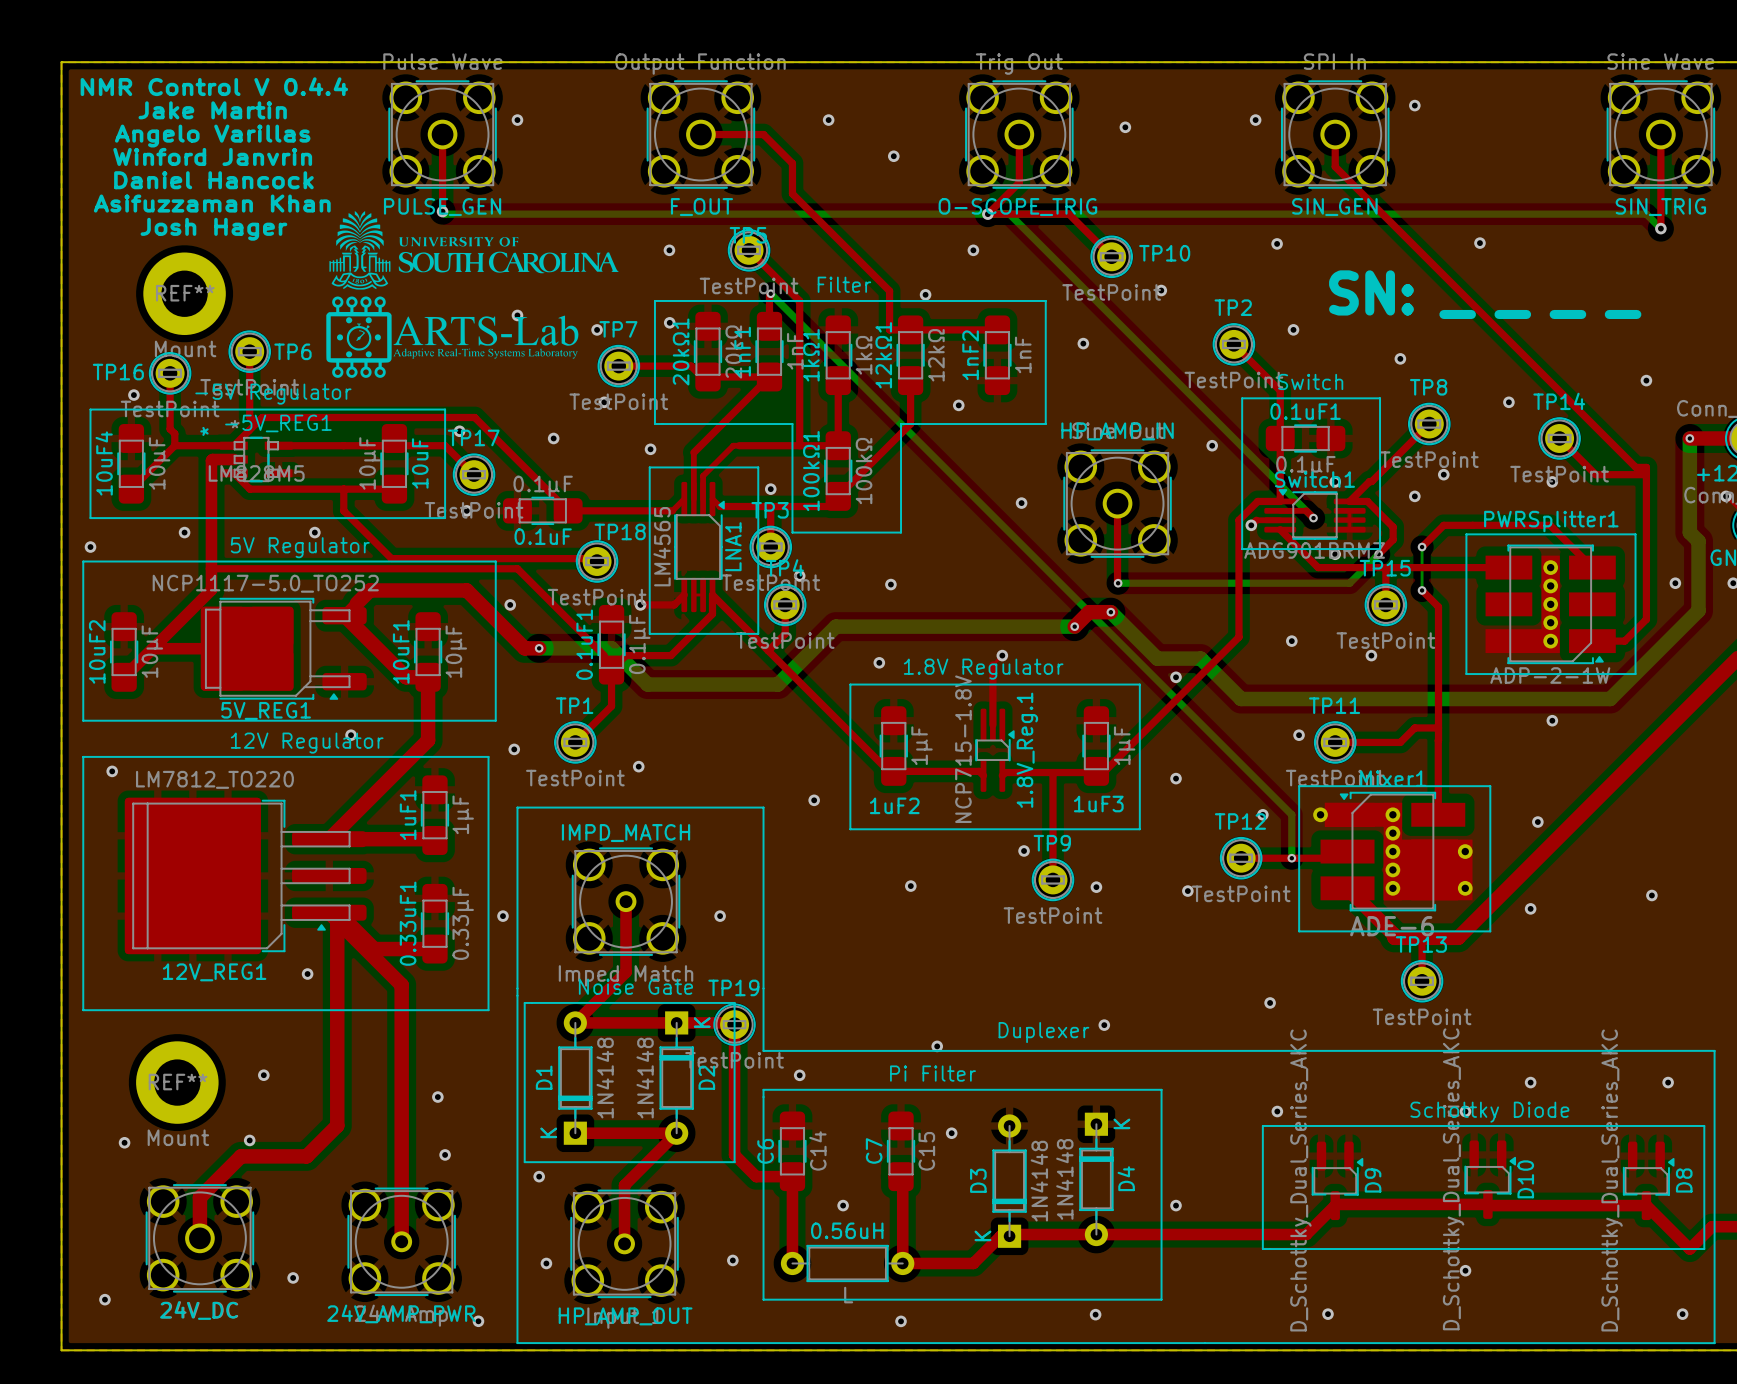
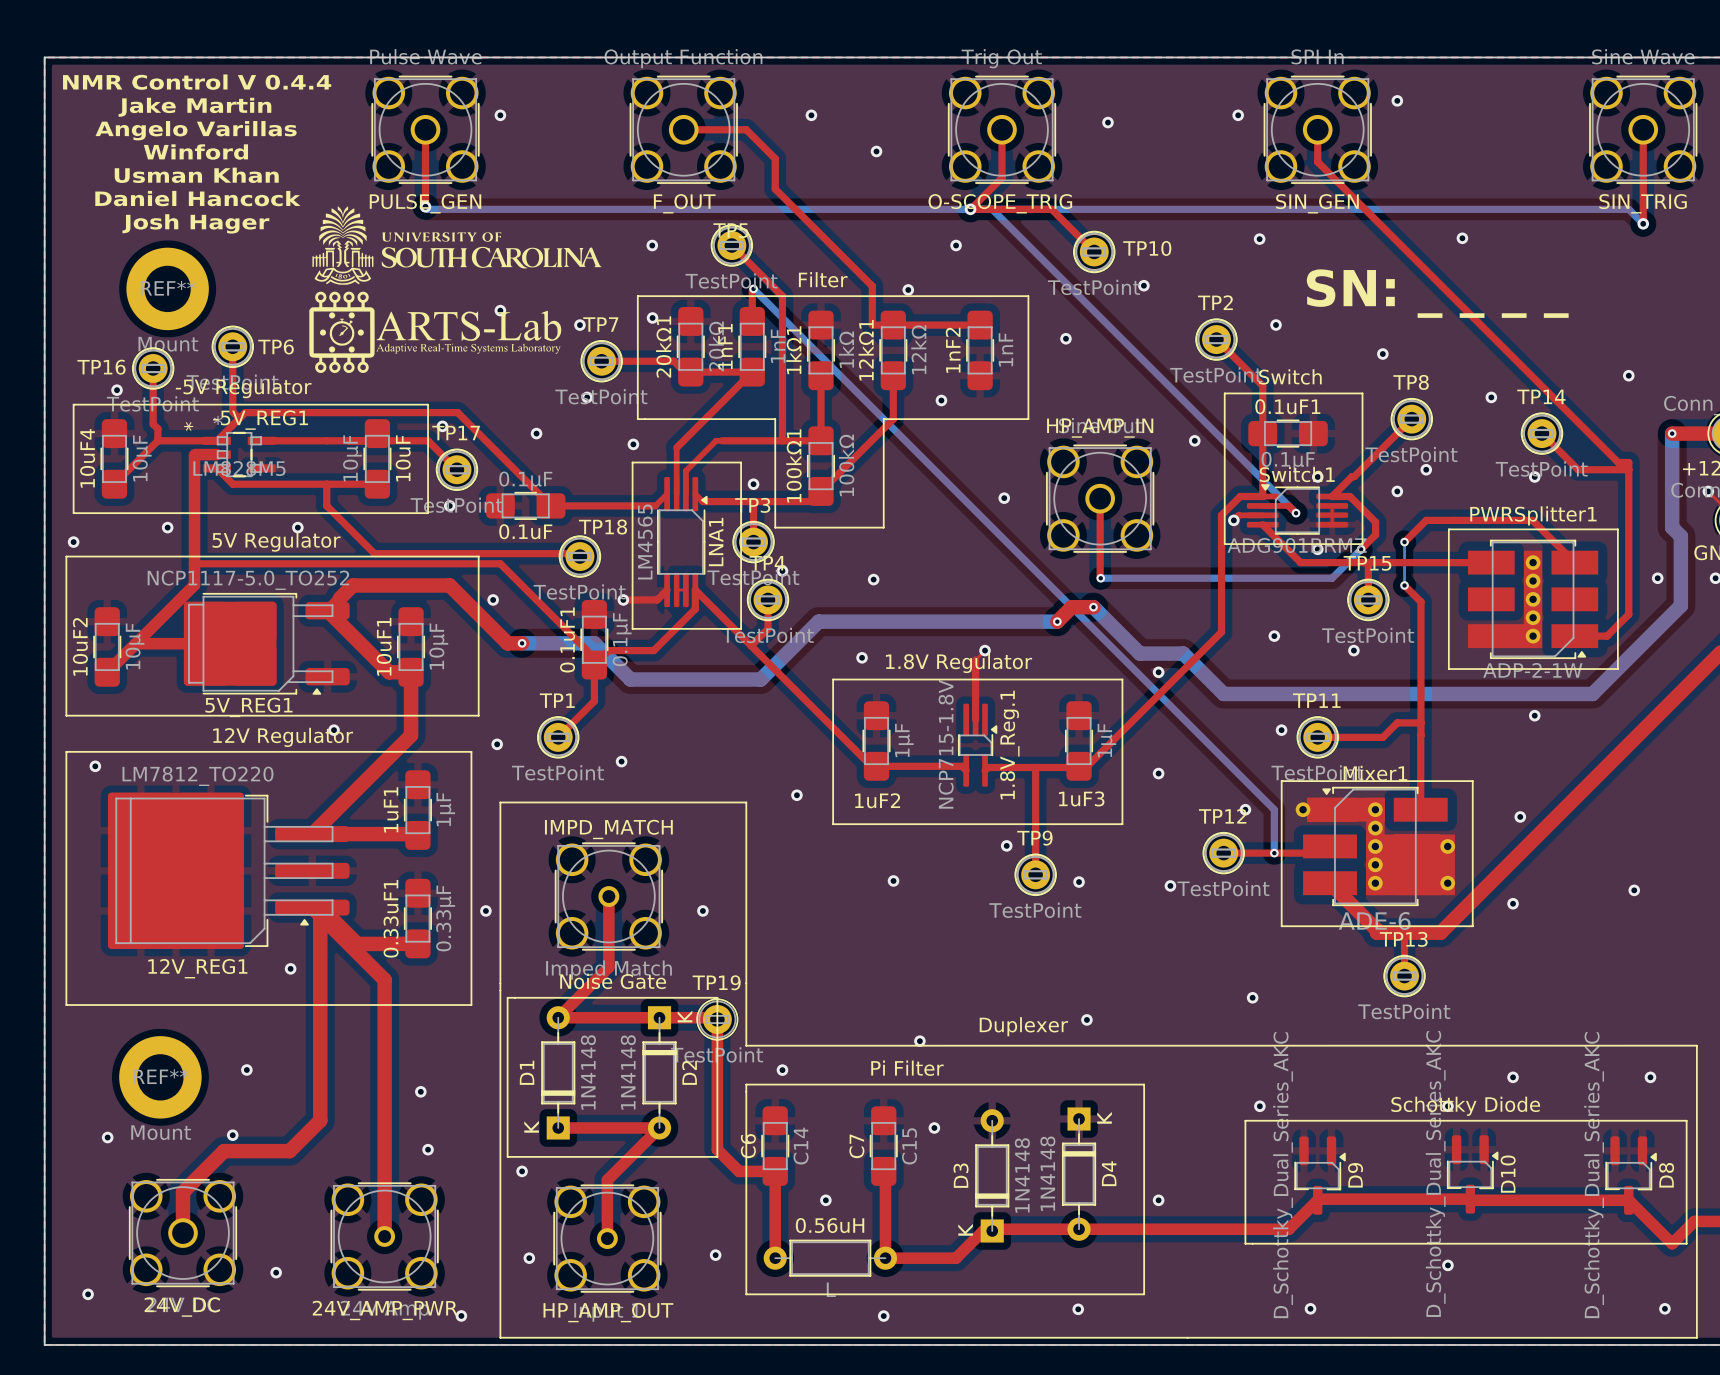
text: Winford Janvrin (212, 156) -> Winford (195, 152)
text: Daniel Hancock (213, 180) -> Usman Khan (196, 175)
text: Asifuzzaman Khan (212, 203) -> Daniel Hancock (197, 198)

